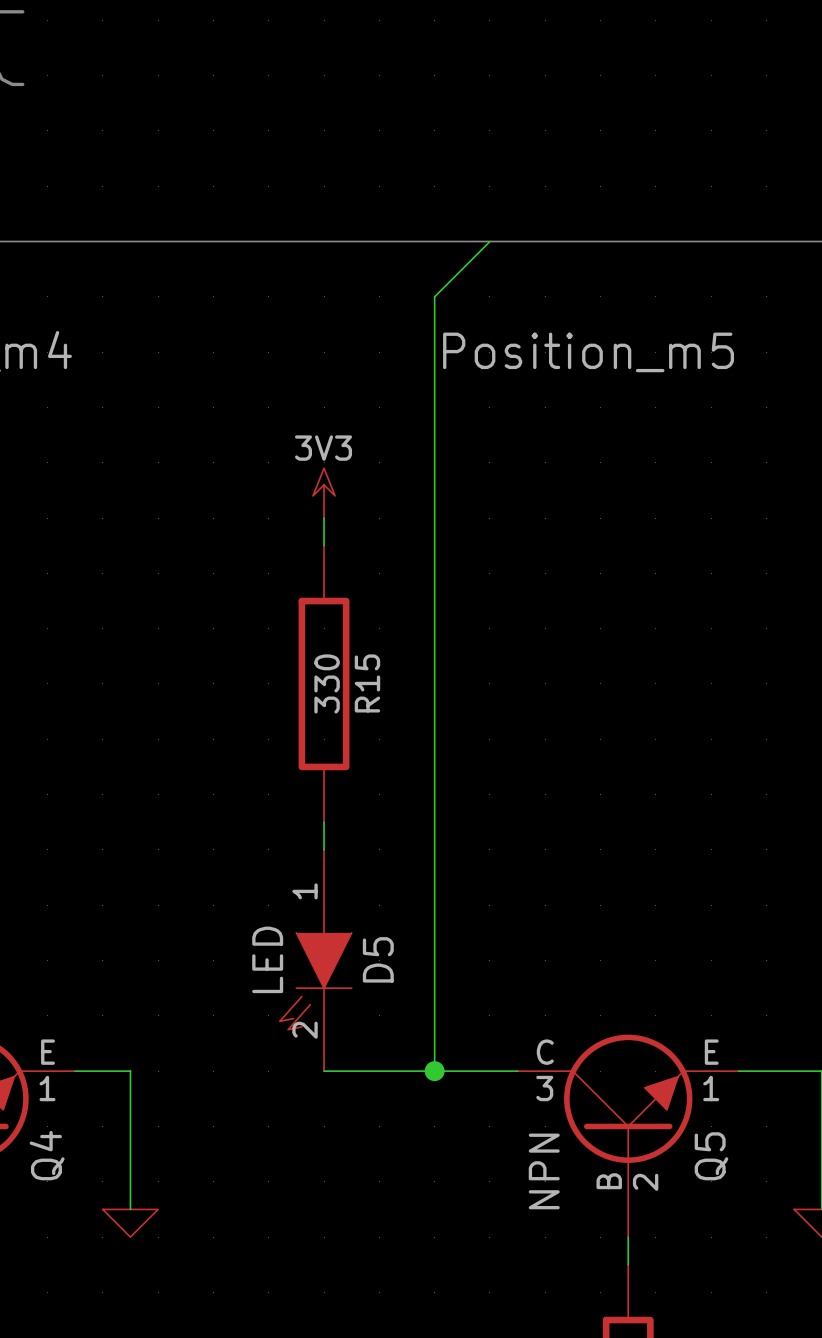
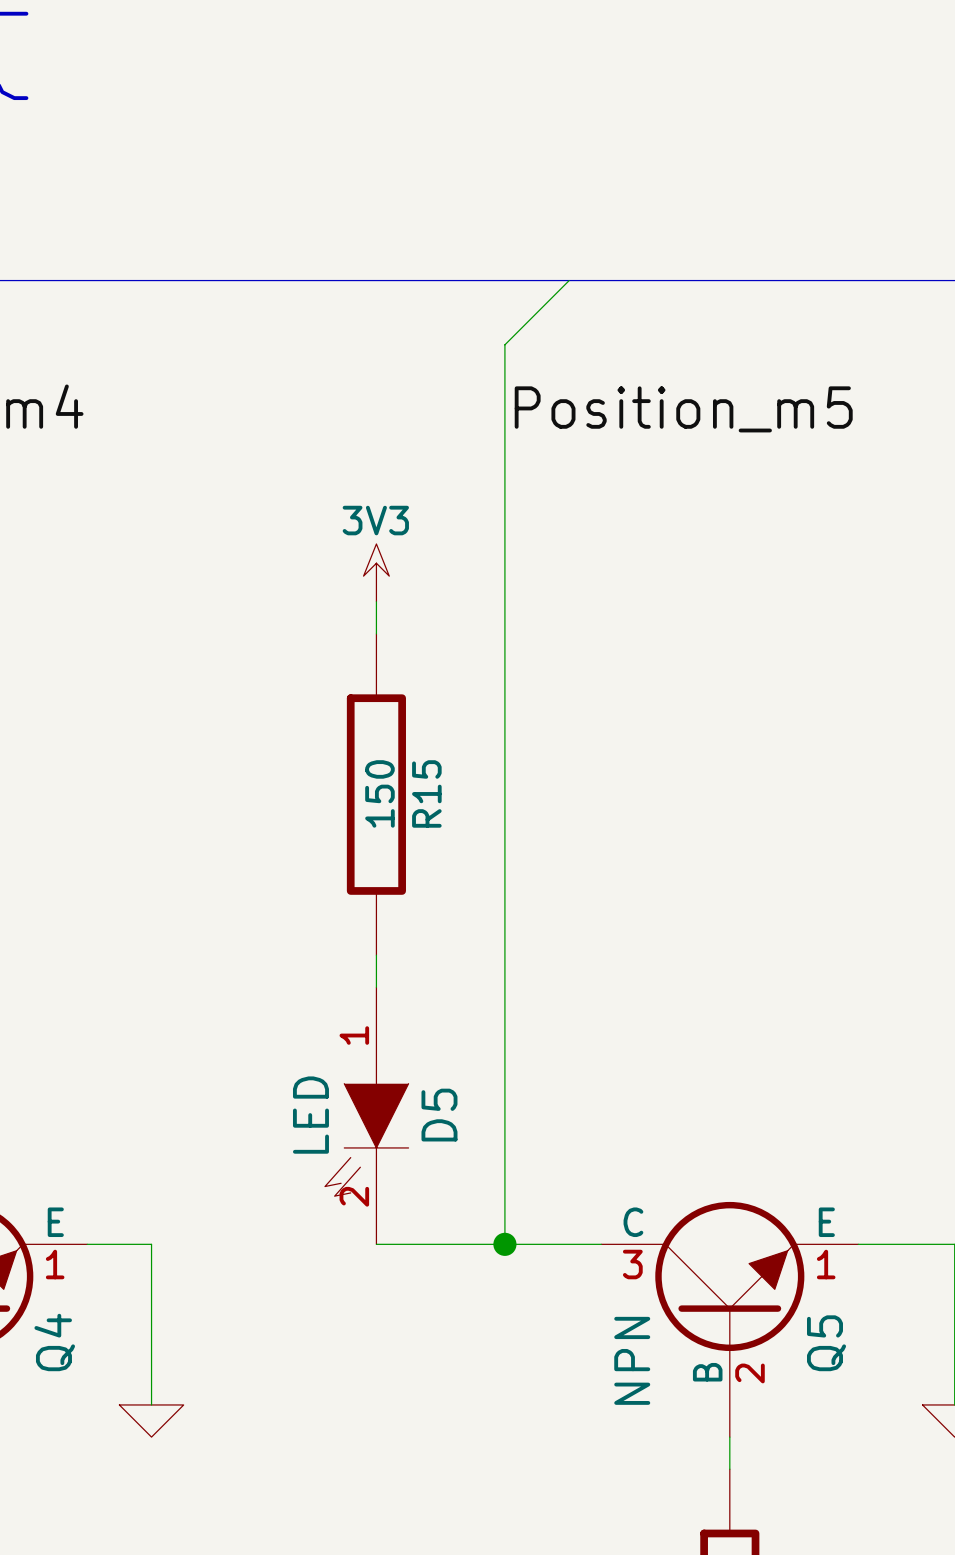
R15 value: 330 (327, 683) -> 150 (379, 793)

